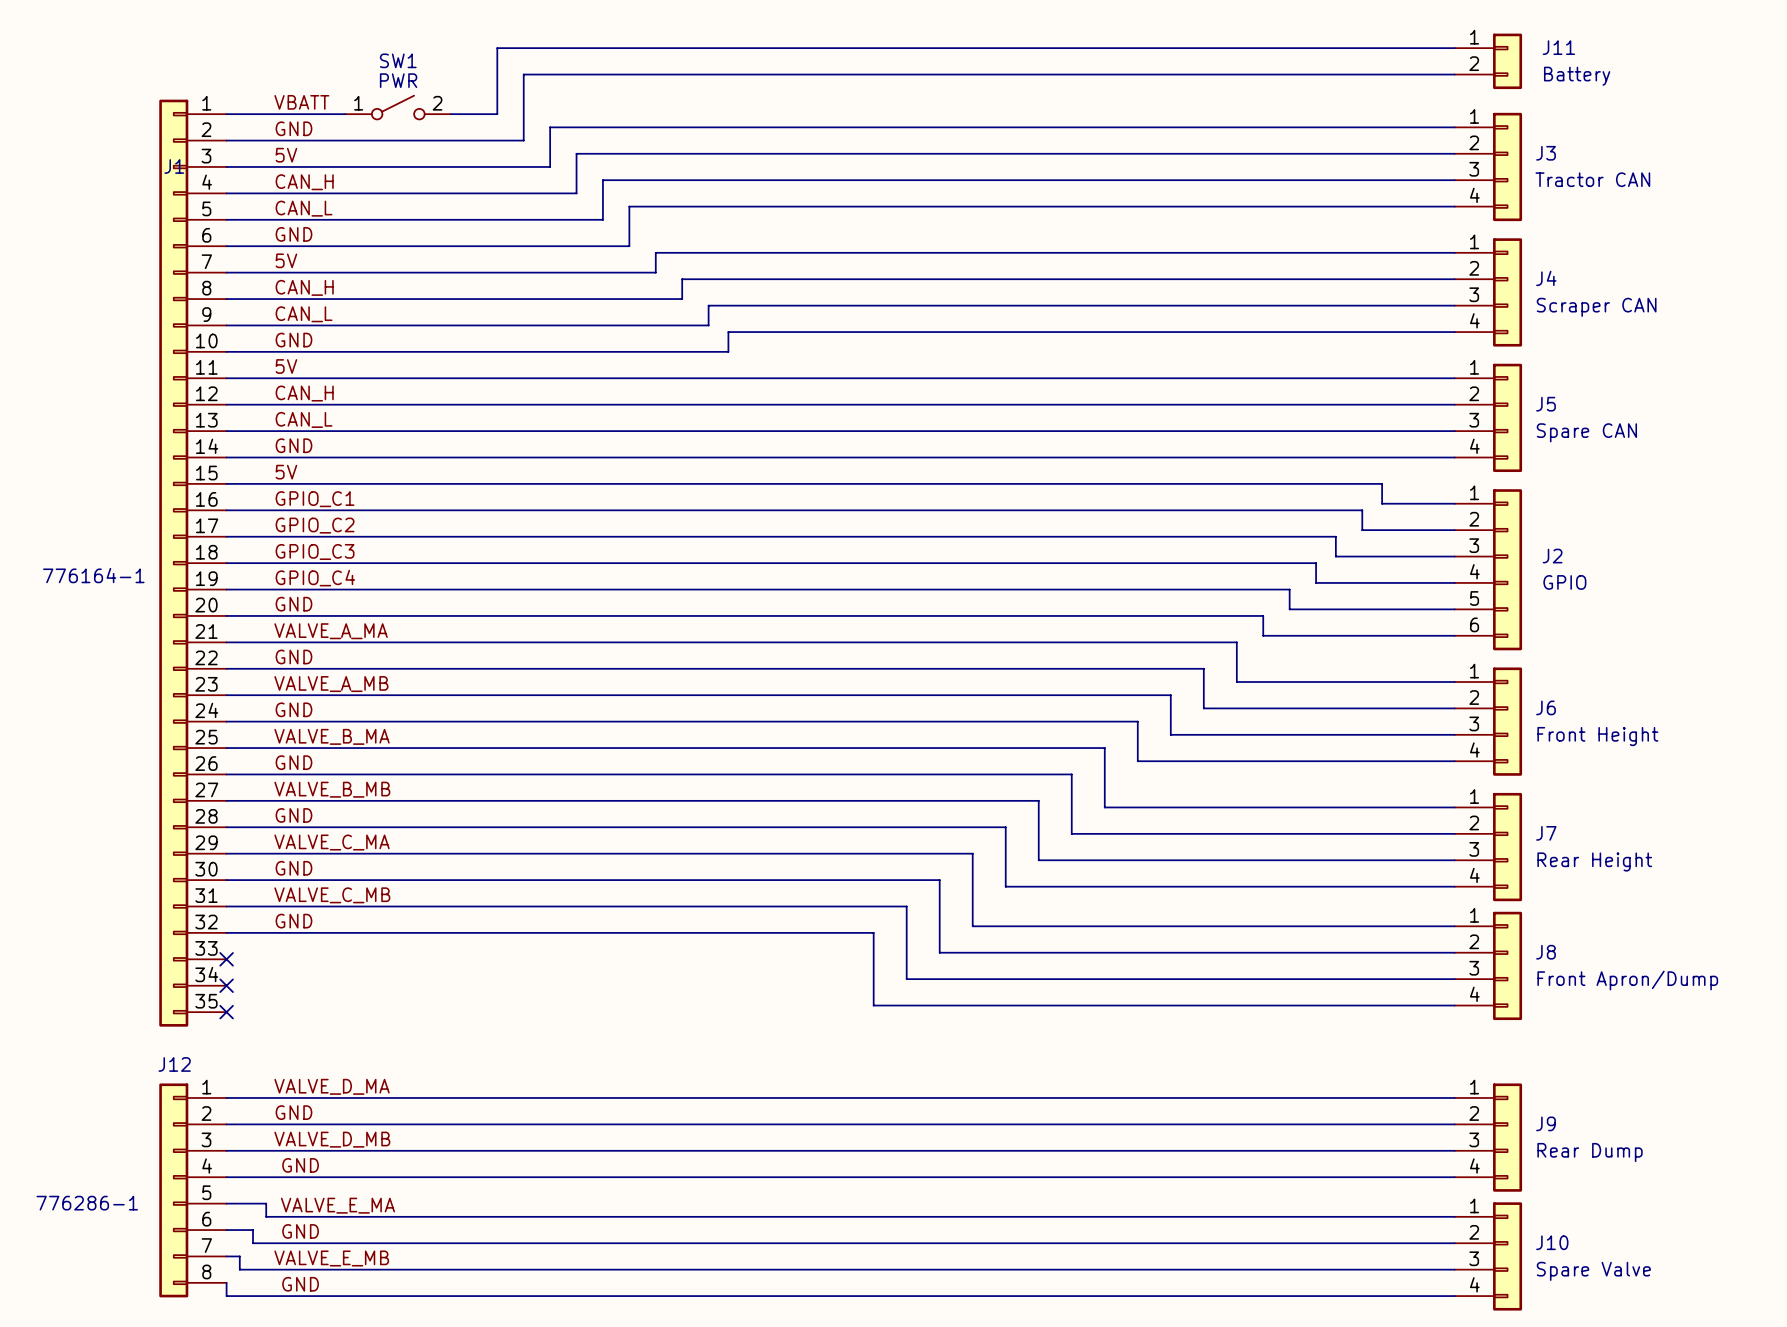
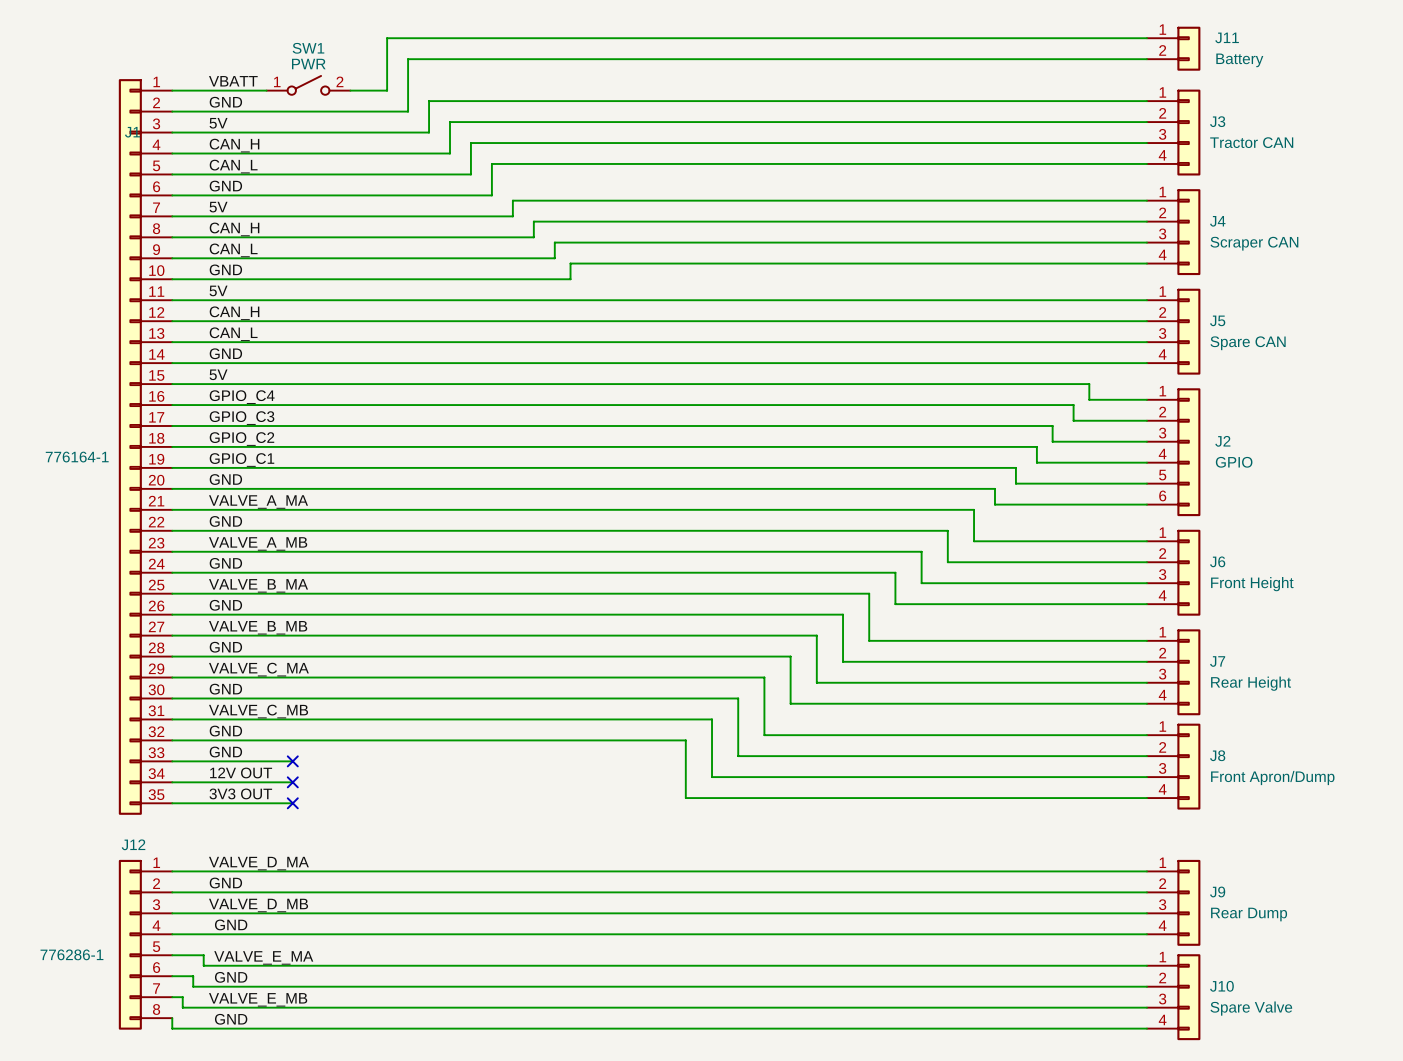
label: GPIO_C1 (315, 499) -> GPIO_C4 (242, 397)
label: GPIO_C2 (315, 525) -> GPIO_C3 (242, 418)
label: GPIO_C3 (315, 551) -> GPIO_C2 (241, 439)
label: GPIO_C4 (315, 578) -> GPIO_C1 (241, 460)
label: none -> GND (225, 752)
wire: none -> (172, 761) (292, 761)
no-connect mark: (226, 959) -> none
no-connect mark: none -> (292, 761)
label: none -> 12V OUT (241, 772)
wire: none -> (172, 782) (292, 782)
no-connect mark: (226, 985) -> none
no-connect mark: none -> (292, 782)
label: none -> 3V3 OUT (240, 793)
wire: none -> (172, 803) (292, 803)
no-connect mark: (226, 1012) -> none
no-connect mark: none -> (292, 803)

